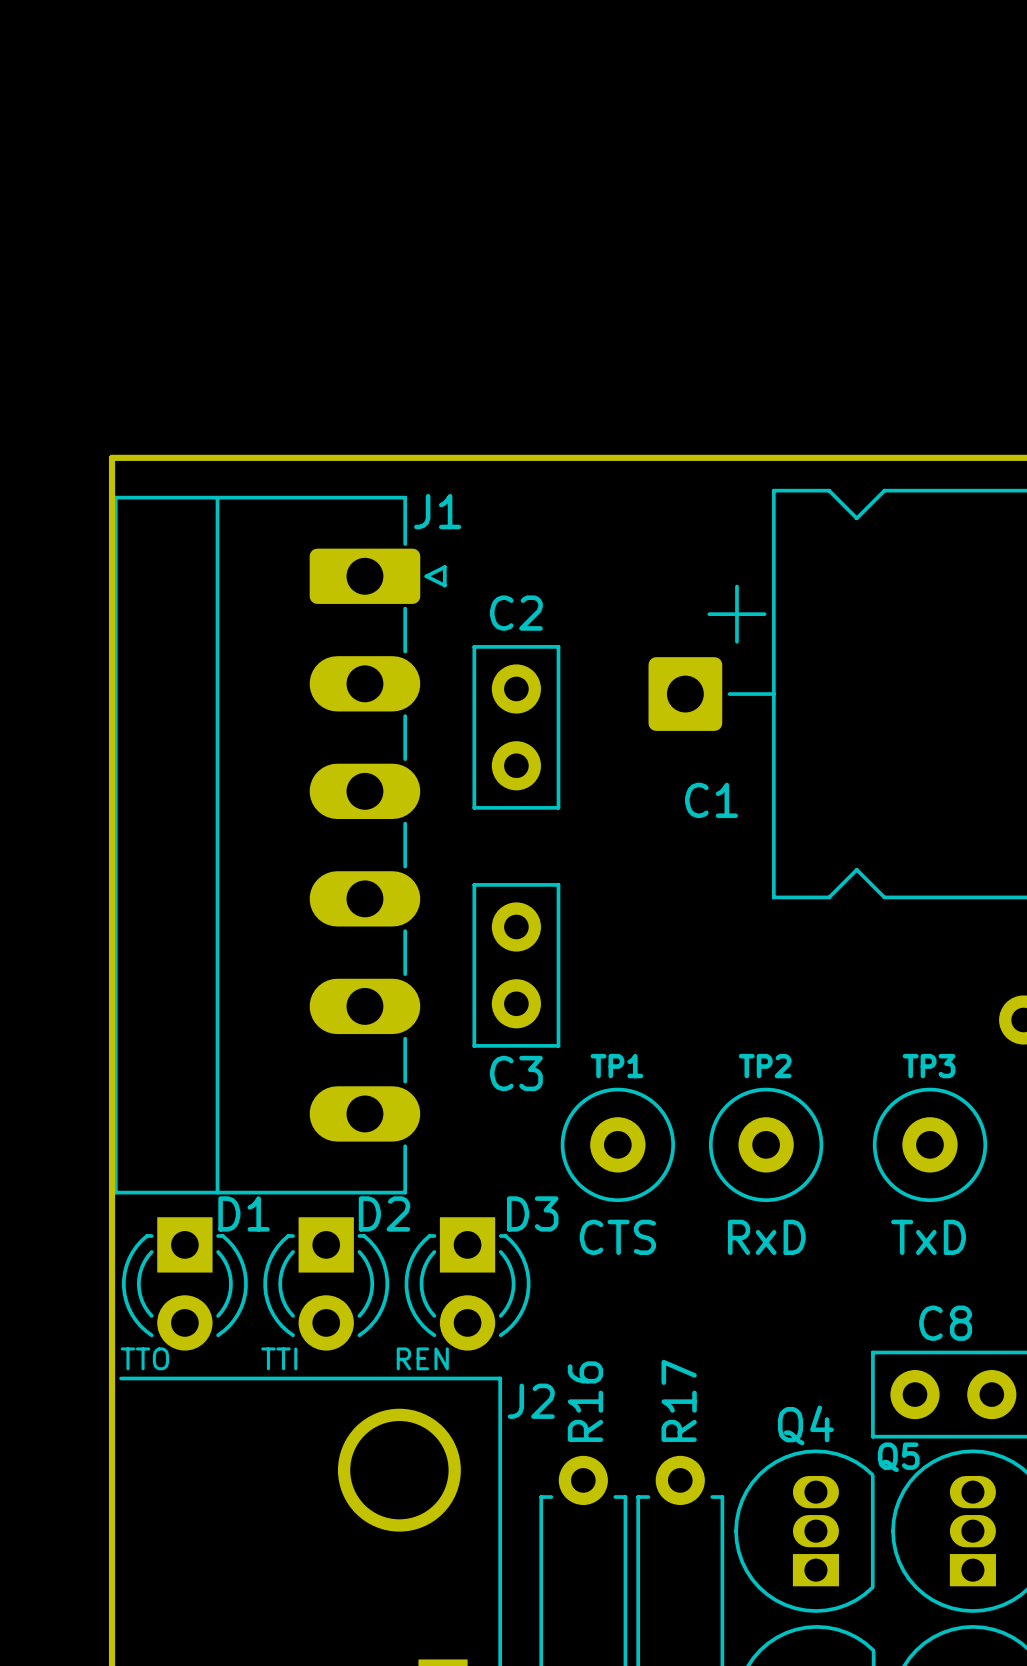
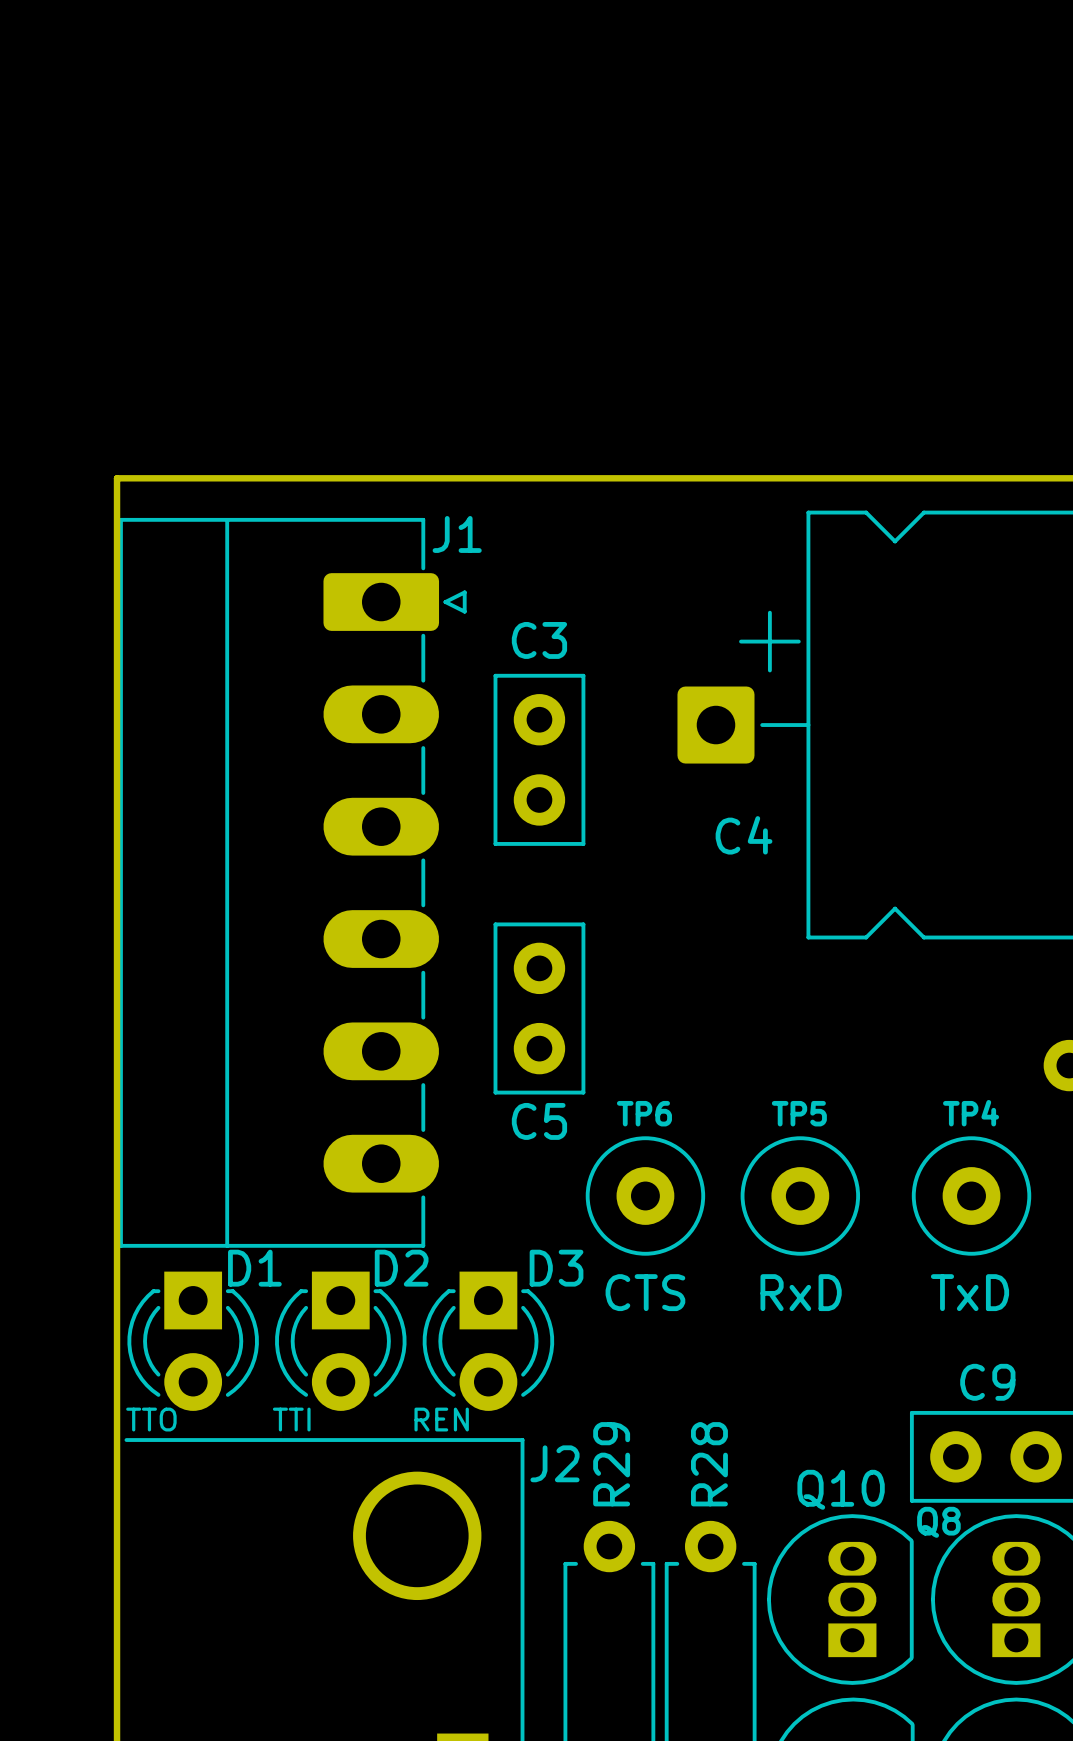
C2 name: C2 (516, 613) -> C3 (539, 640)
C1 name: C1 (711, 800) -> C4 (744, 835)
TP1 name: TP1 (616, 1066) -> TP6 (644, 1113)
TP2 name: TP2 (765, 1066) -> TP5 (799, 1113)
TP3 name: TP3 (929, 1066) -> TP4 (971, 1113)
C3 name: C3 (516, 1073) -> C5 (539, 1121)
C8 name: C8 (945, 1323) -> C9 (987, 1382)
R17 name: R17 (679, 1400) -> R29 (611, 1464)
R16 name: R16 (585, 1401) -> R28 (709, 1464)
Q4 name: Q4 (805, 1425) -> Q10 (841, 1489)
Q5 name: Q5 (898, 1457) -> Q8 (938, 1522)

